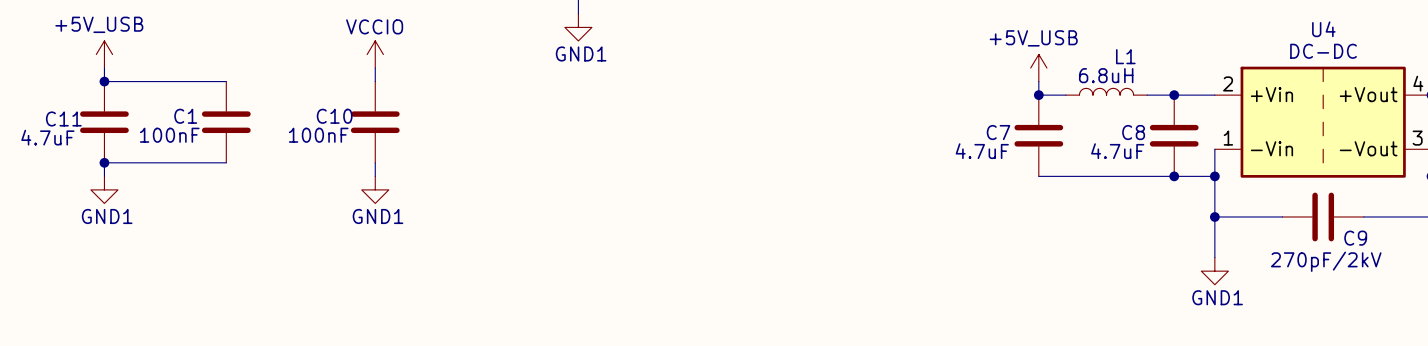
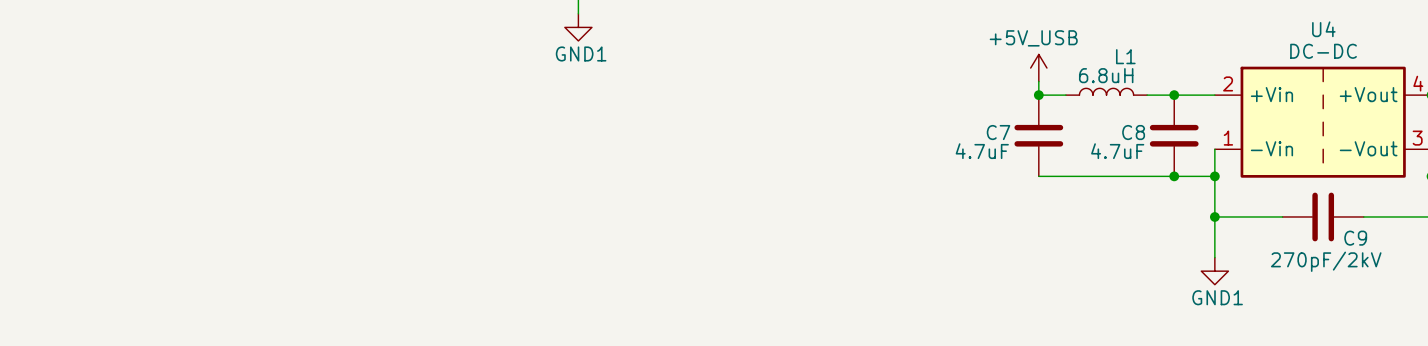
power symbol: +5V_USB (104, 54) -> none
power symbol: VCCIO (375, 54) -> none
wire: (104, 68) (104, 81) (226, 81) -> none
wire: (375, 68) (375, 81) -> none
junction: (104, 81) -> none
C11: 4.7uF (104, 122) -> none
C1: 100nF (226, 122) -> none
C10: 100nF (375, 122) -> none
junction: (104, 162) -> none
wire: (226, 162) (104, 162) (104, 176) -> none
wire: (375, 162) (375, 176) -> none
power symbol: GND1 (104, 189) -> none
power symbol: GND1 (375, 189) -> none

